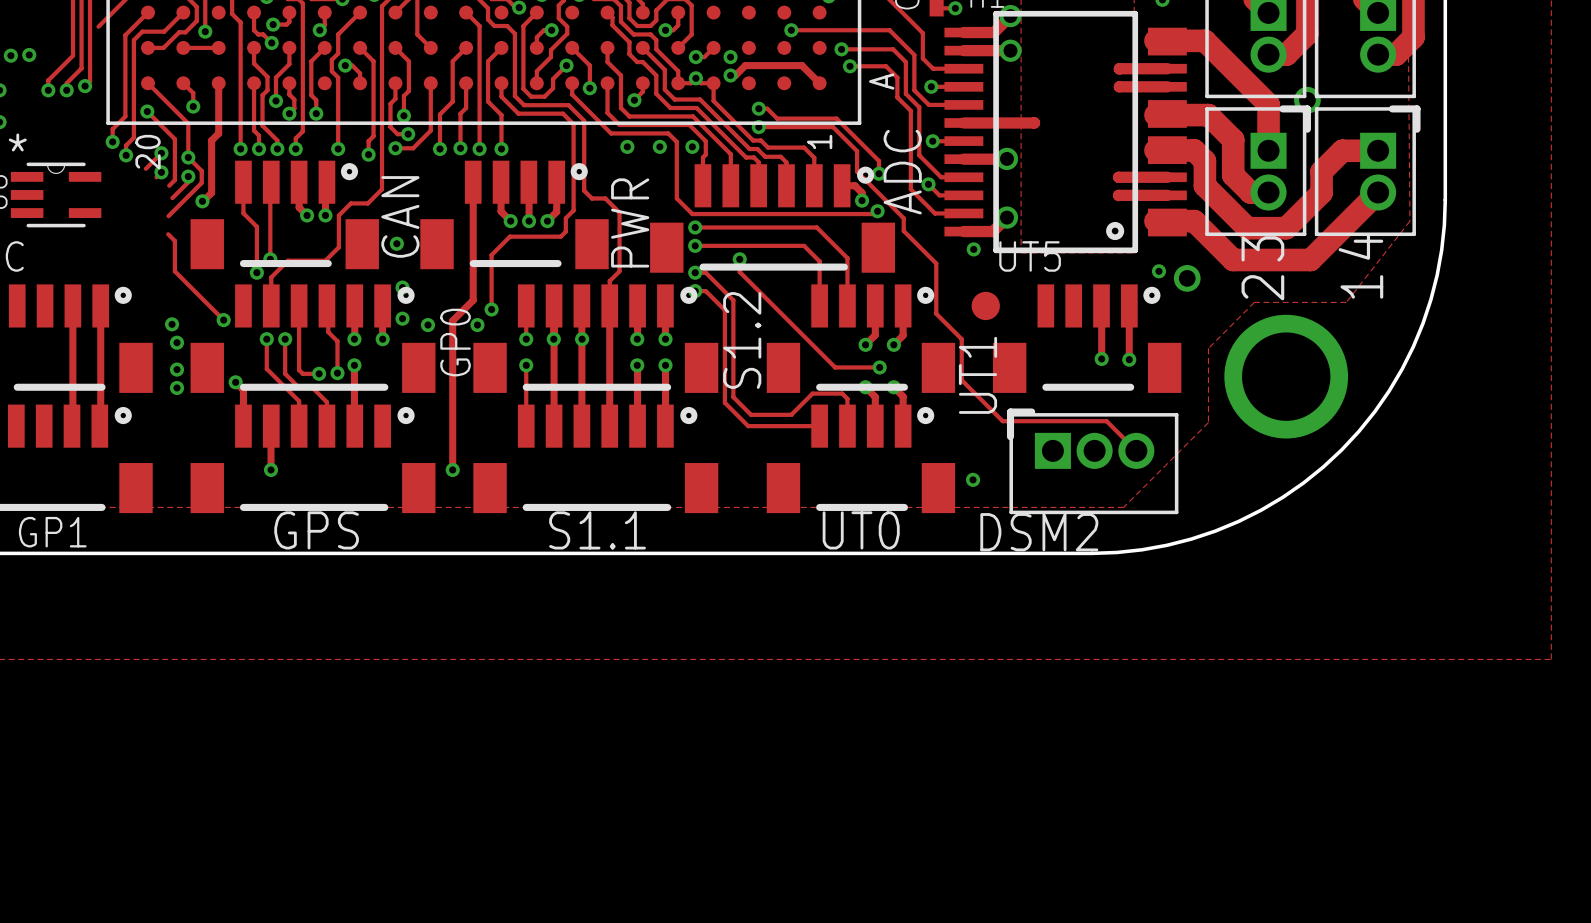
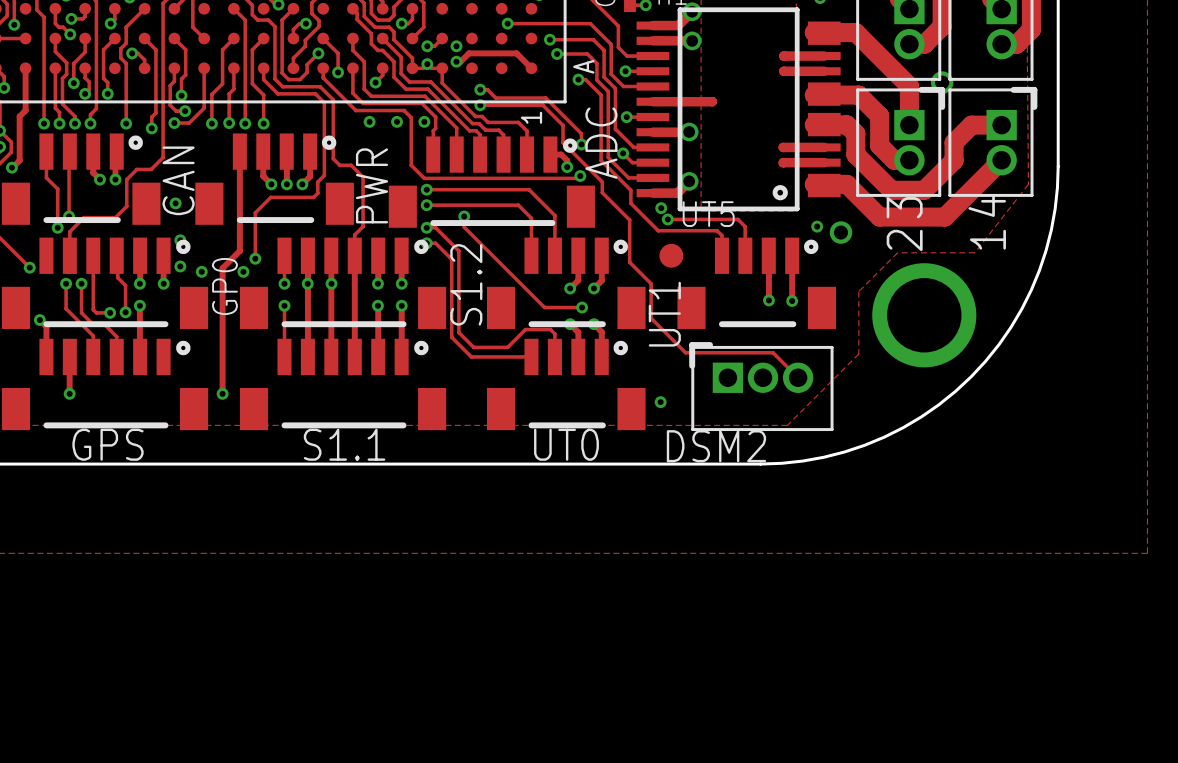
track: none -> (578, 79) (585, 79) (601, 95) (601, 160) (630, 190) (630, 203) (658, 230) (717, 230) (721, 235) (721, 255)
via: none -> (578, 79)
track: none -> (667, 219) (738, 219) (745, 226) (745, 256)
via: none -> (667, 219)

